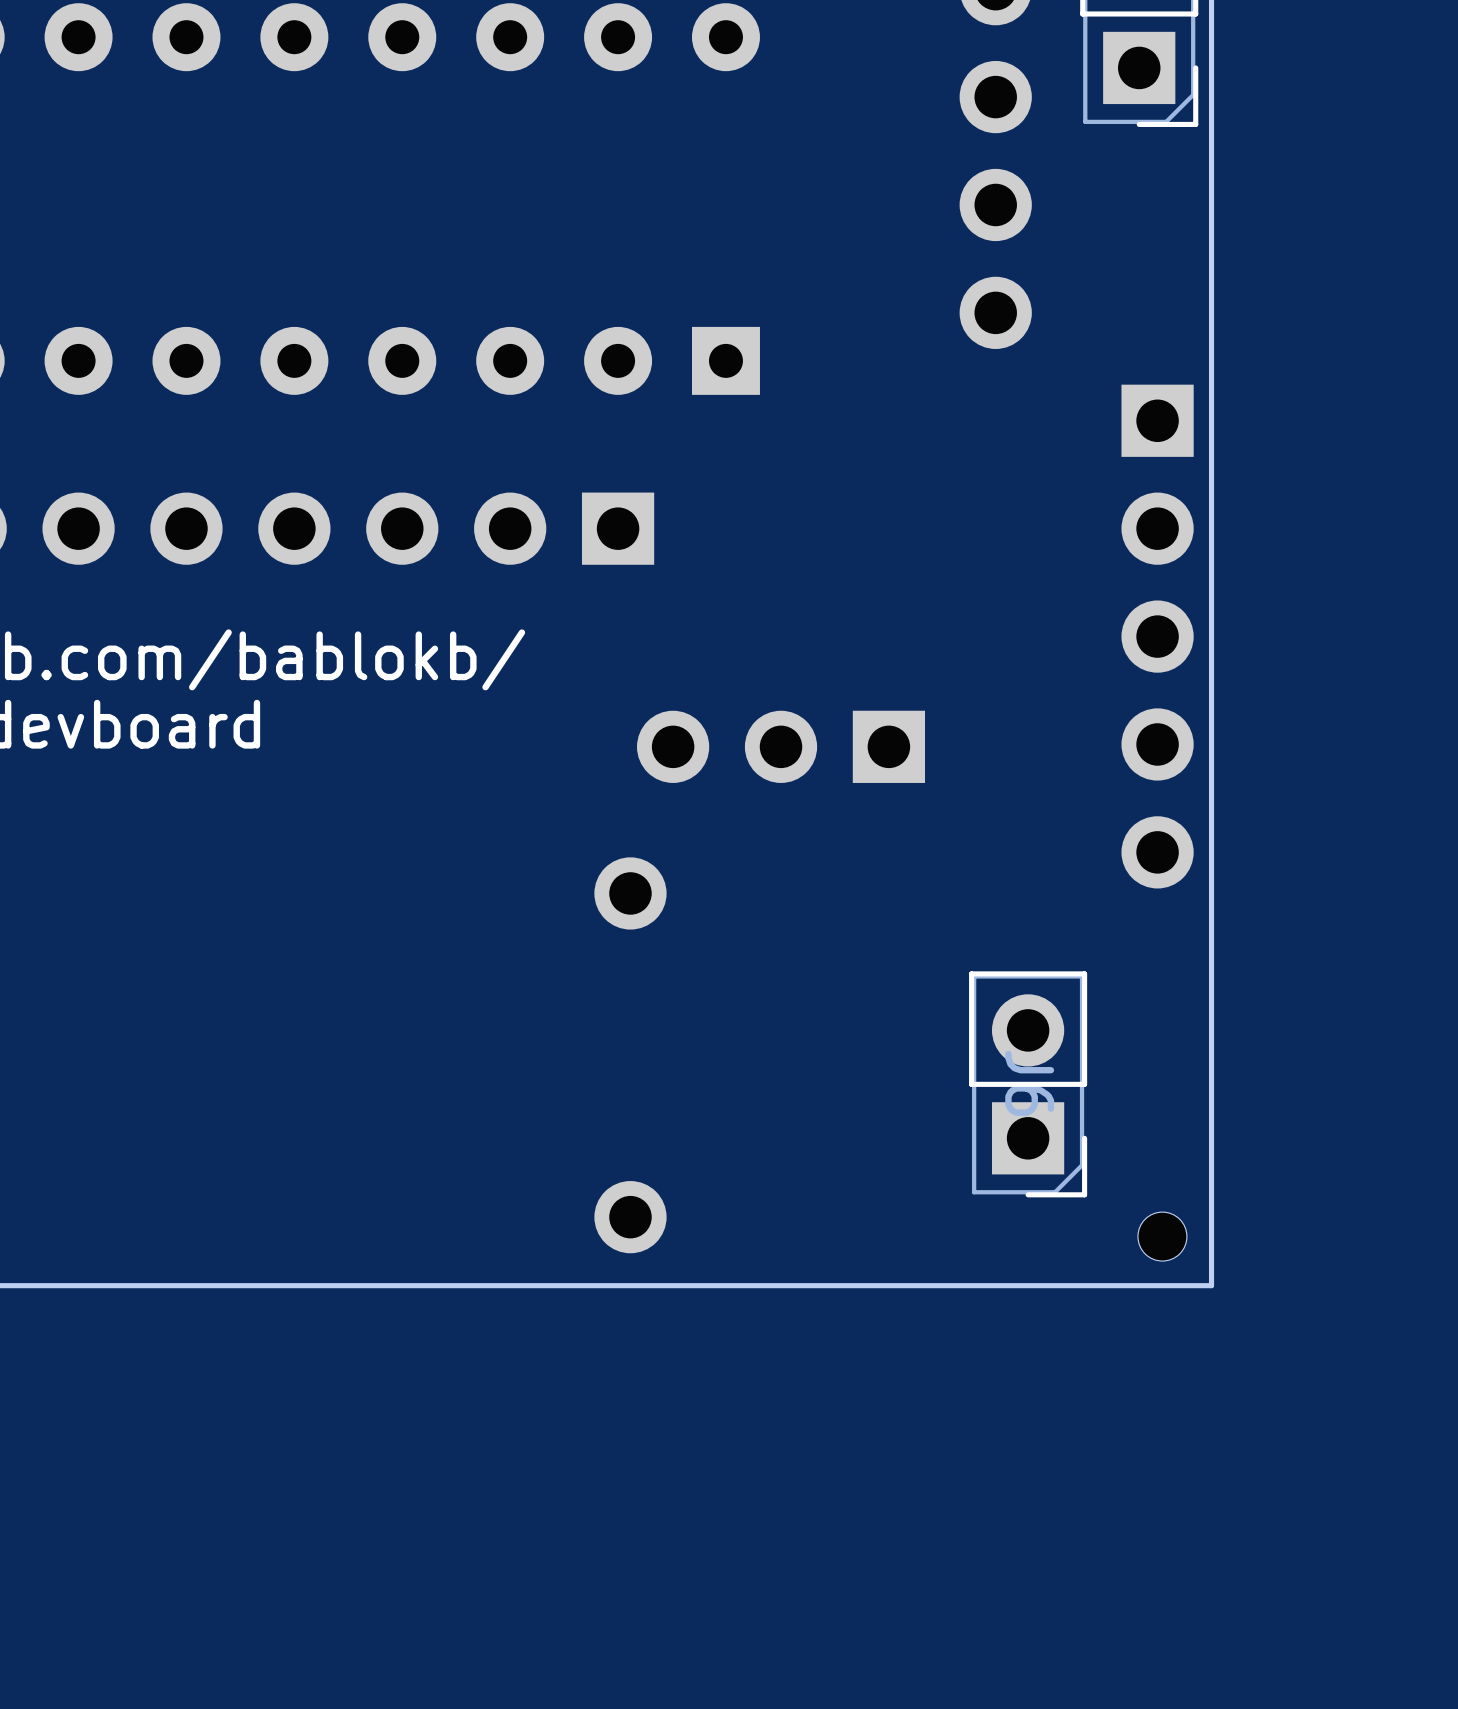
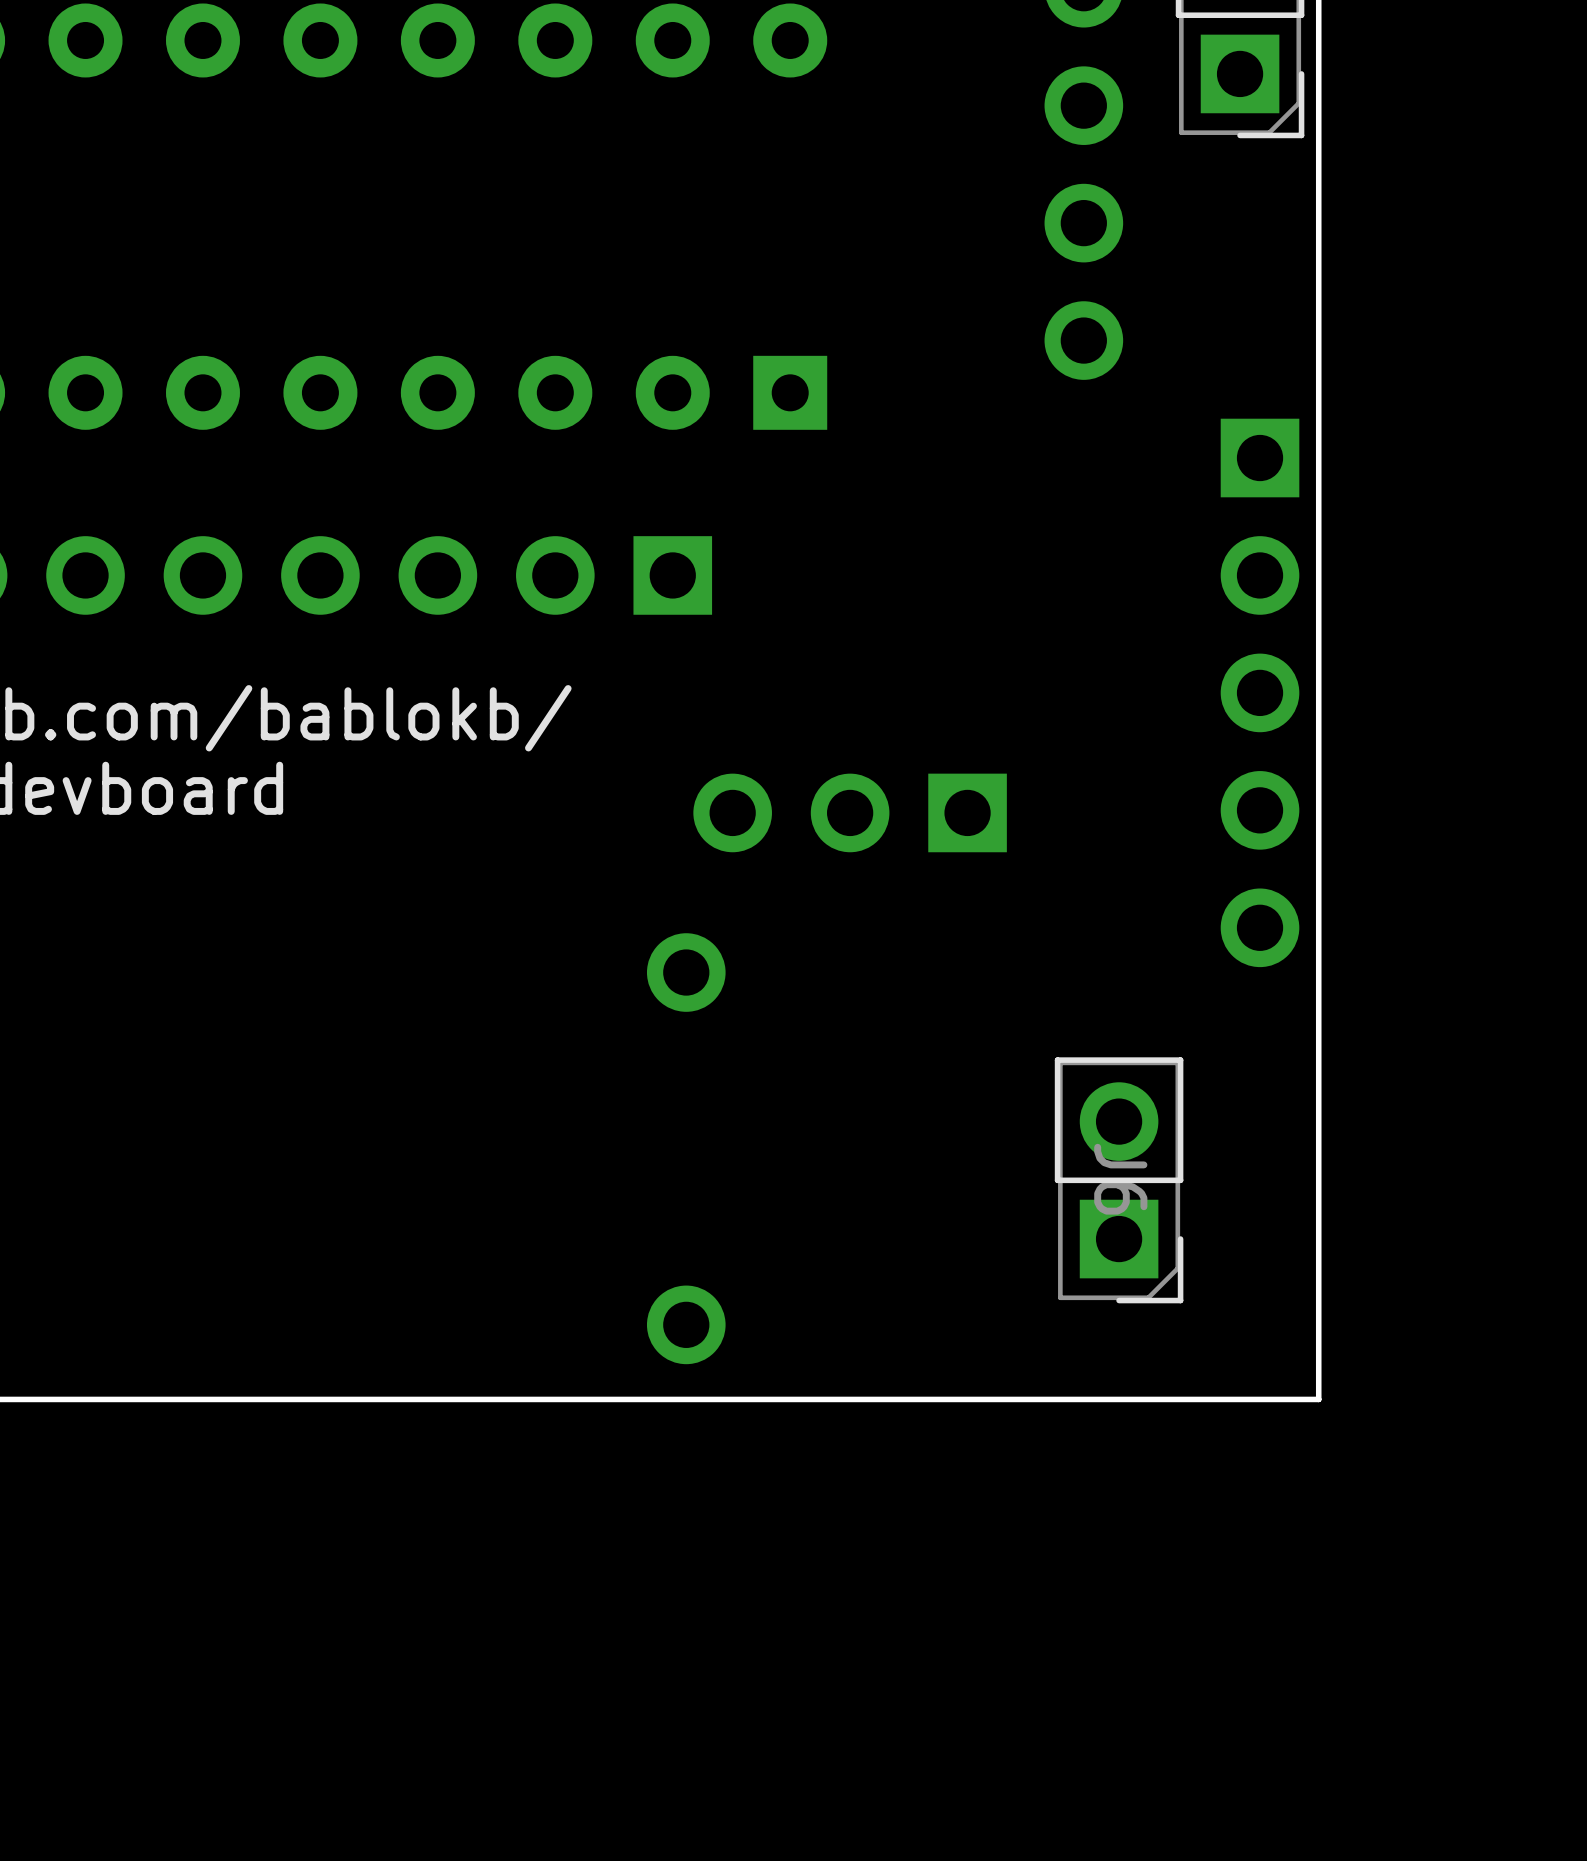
part: (1162, 1236) -> none

